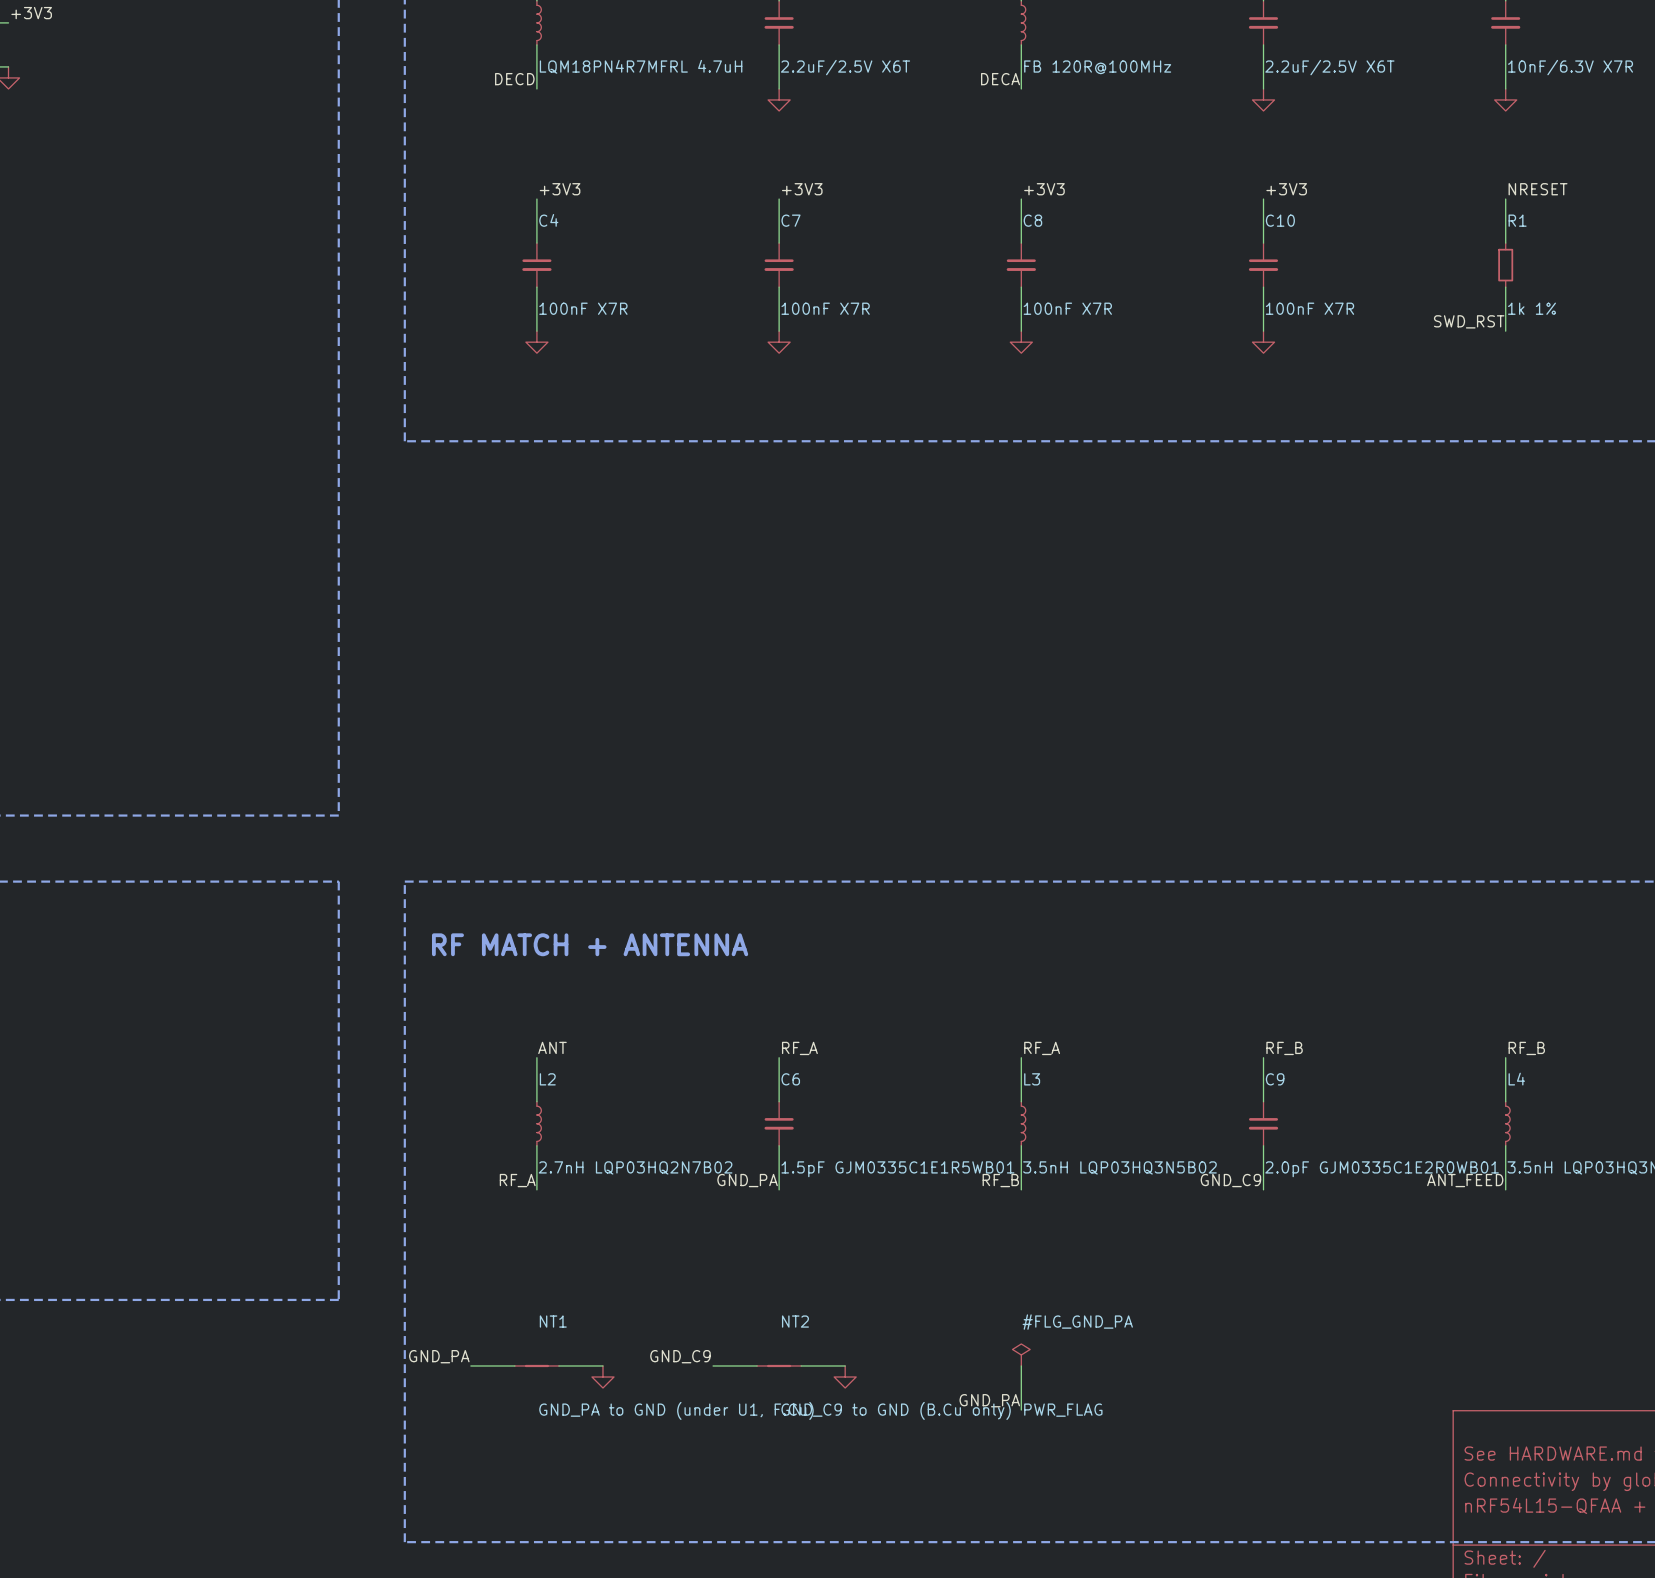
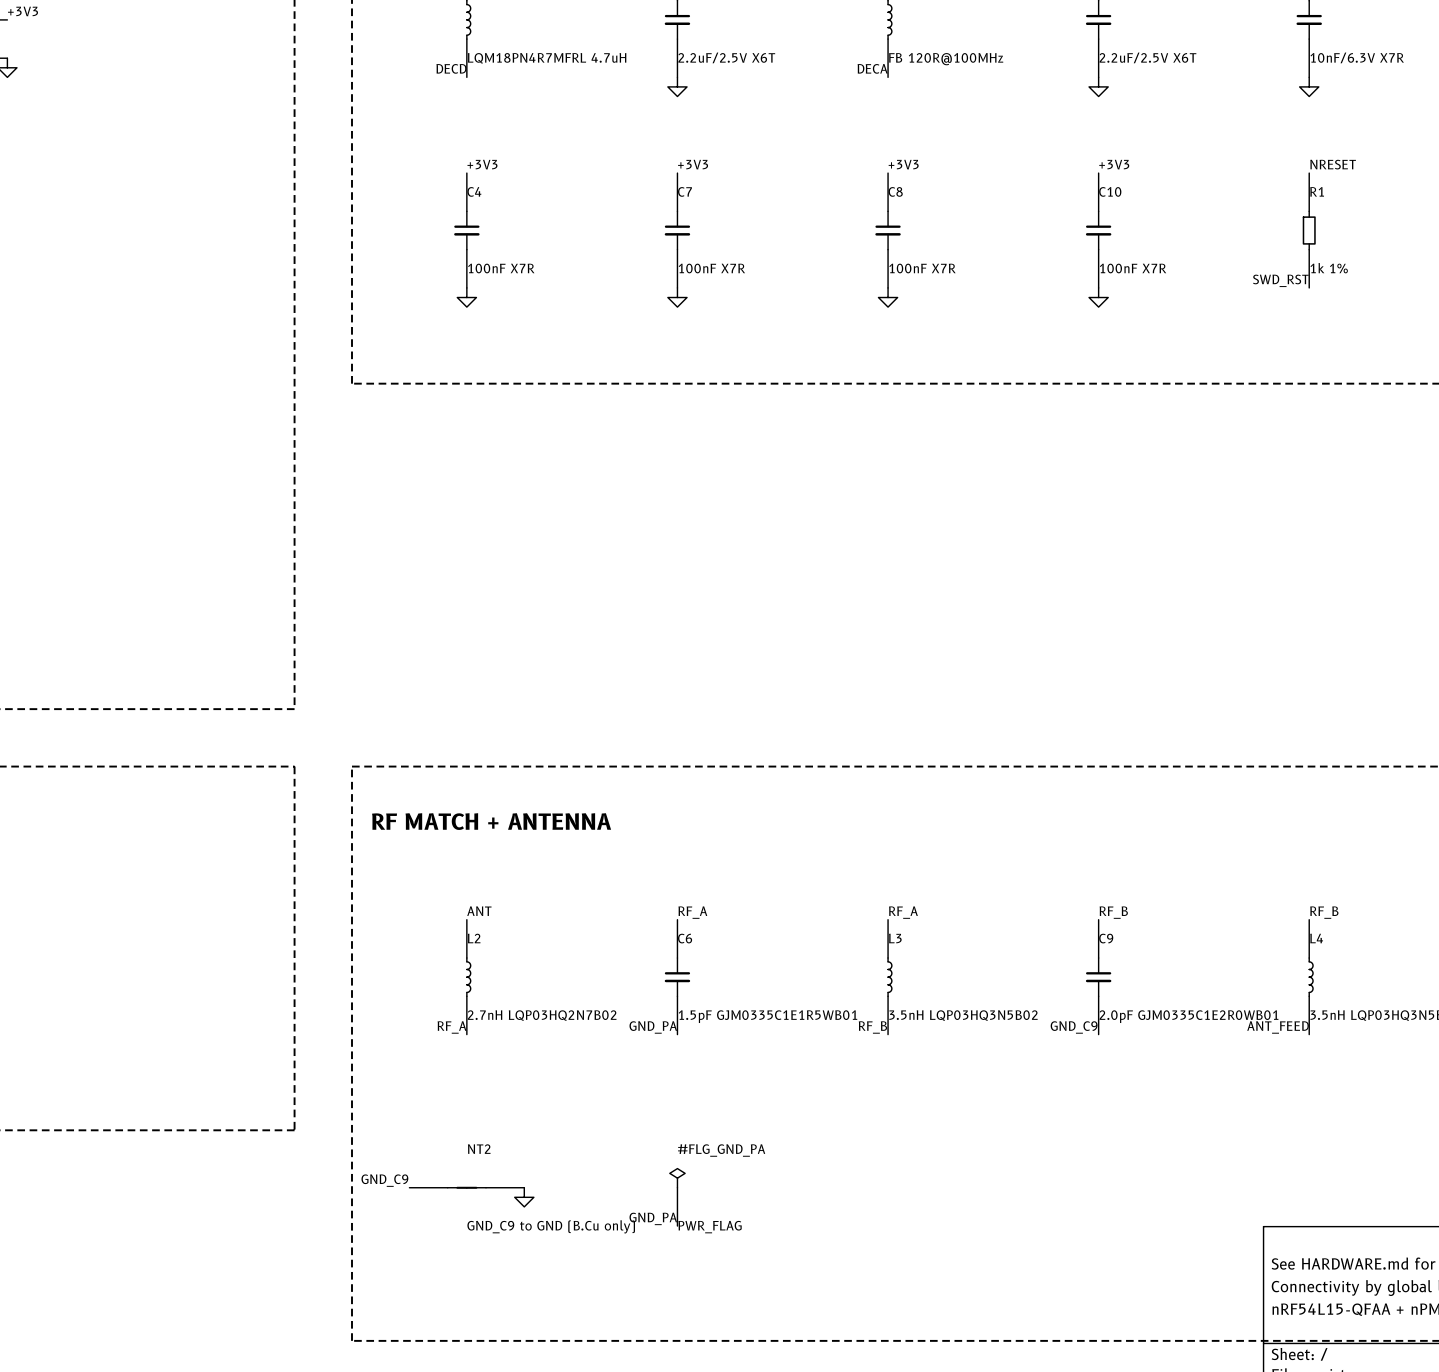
NT1 name: NT1 (553, 1321) -> NT2 (479, 1149)
#FLG_GND_PA: none -> PWR_FLAG (677, 1178)
#FLG_GND_PA: PWR_FLAG (1021, 1354) -> none
label: GND_PA (439, 1356) -> GND_C9 (384, 1180)
label: GND_C9 (680, 1356) -> none
wire: (713, 1365) (757, 1365) -> none
wire: none -> (677, 1187) (677, 1226)
NT2: GND_C9 to GND (B.Cu only) (779, 1365) -> none
wire: (801, 1365) (845, 1365) -> none
wire: (1021, 1365) (1021, 1410) -> none
power symbol: (845, 1377) -> none
label: none -> GND_PA (653, 1218)
label: GND_PA (989, 1400) -> none
NT1 value: GND_PA to GND (under U1, F.Cu) (676, 1410) -> GND_C9 to GND (B.Cu only) (551, 1226)

